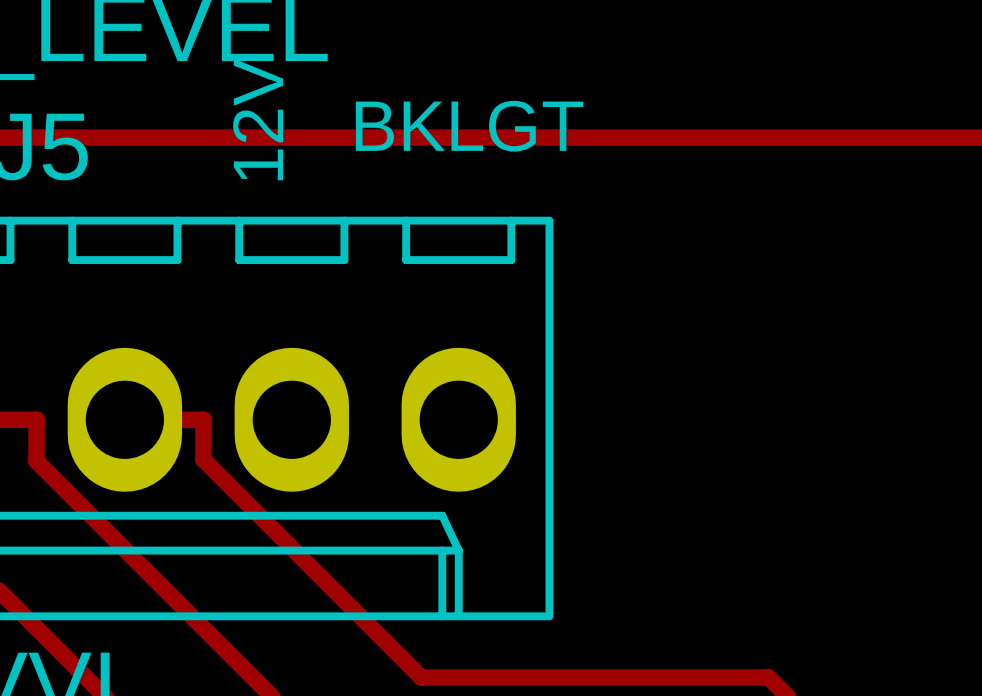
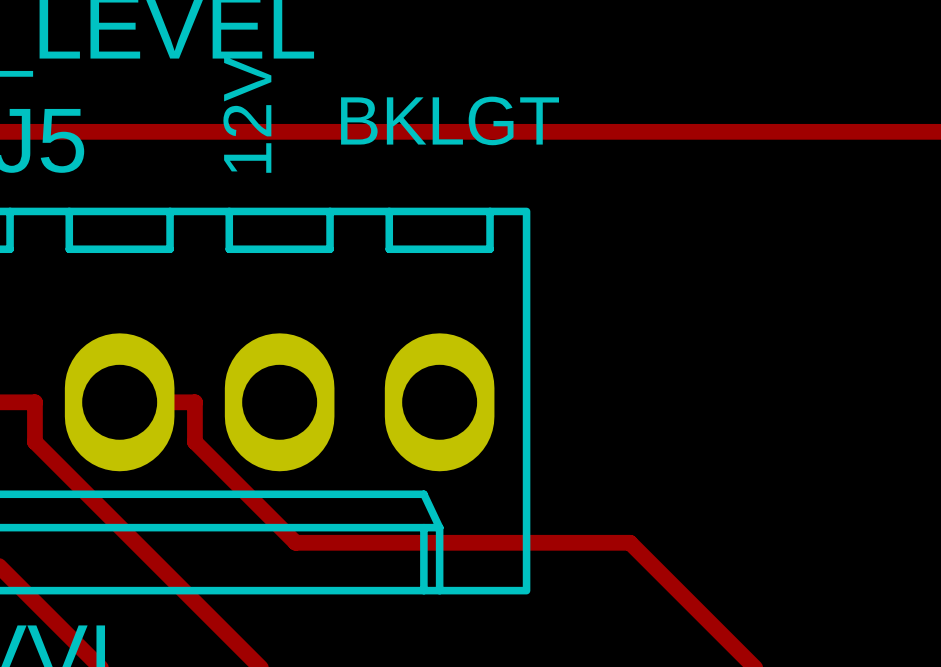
track: (203, 459) (421, 677) (768, 677) -> (194, 440) (295, 542) (630, 542) (736, 649)

